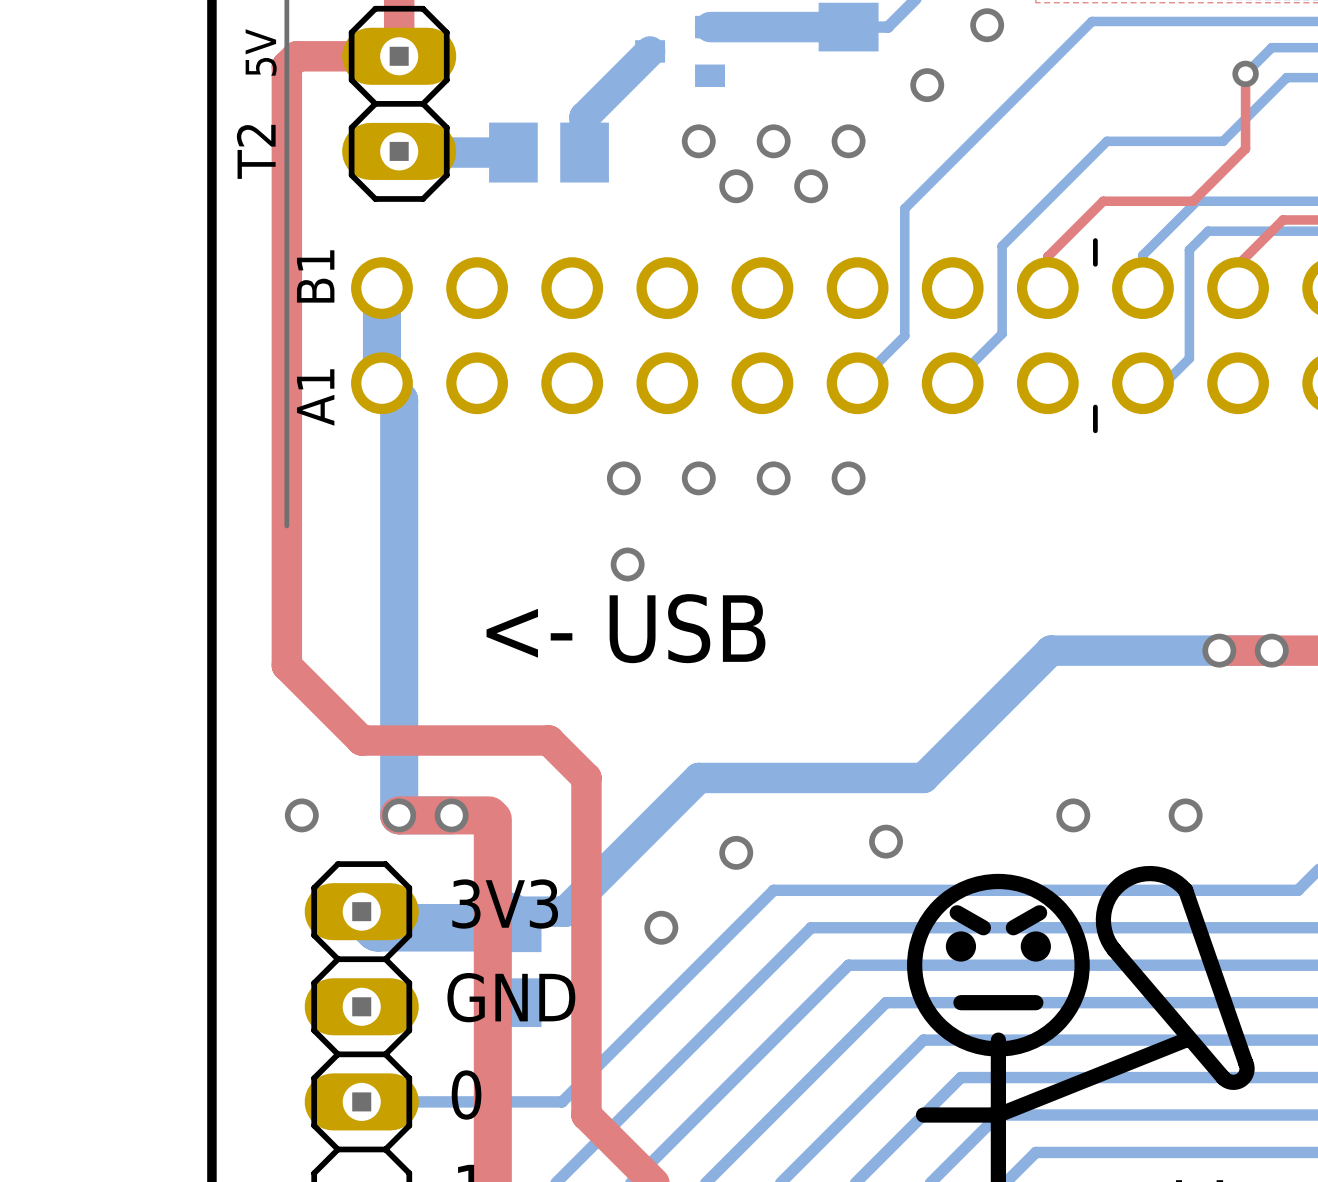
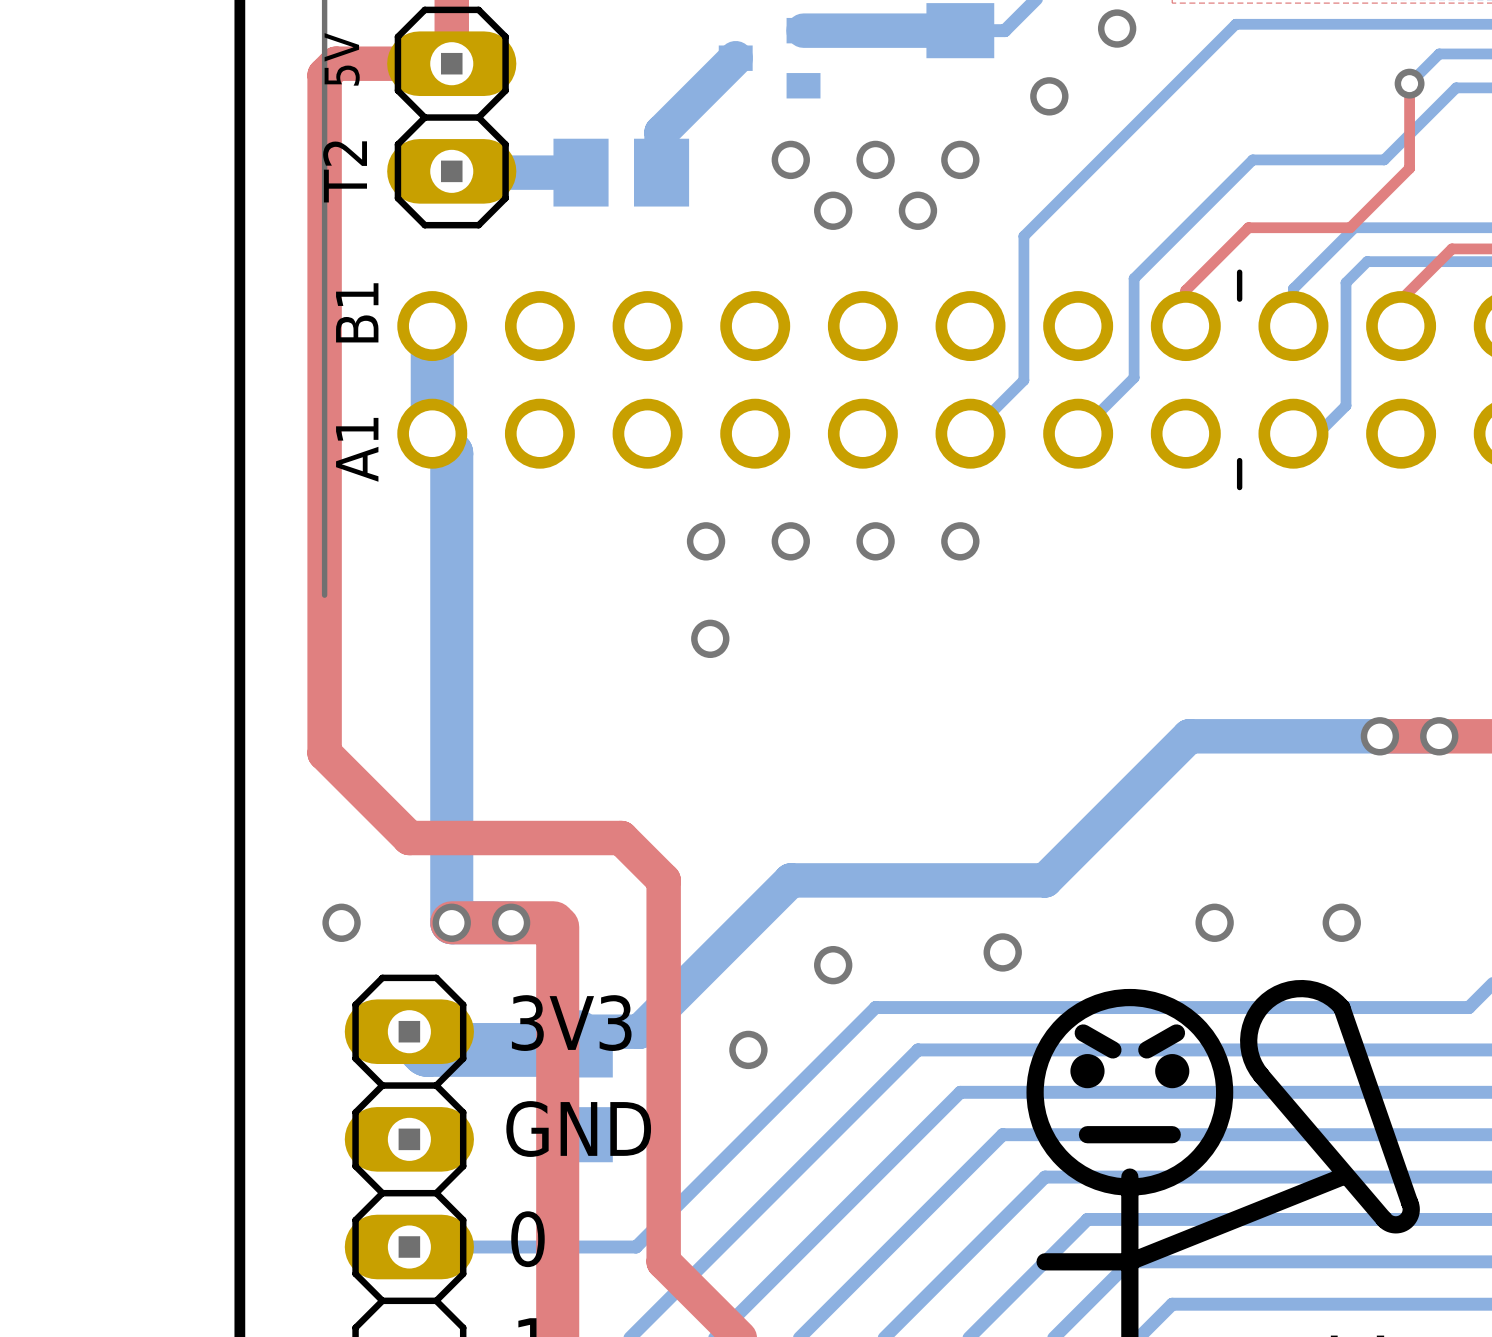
text position: 5V (261, 52) -> 5V (342, 59)
text position: T2 (256, 151) -> T2 (345, 171)
text: <- USB (625, 628) -> none

